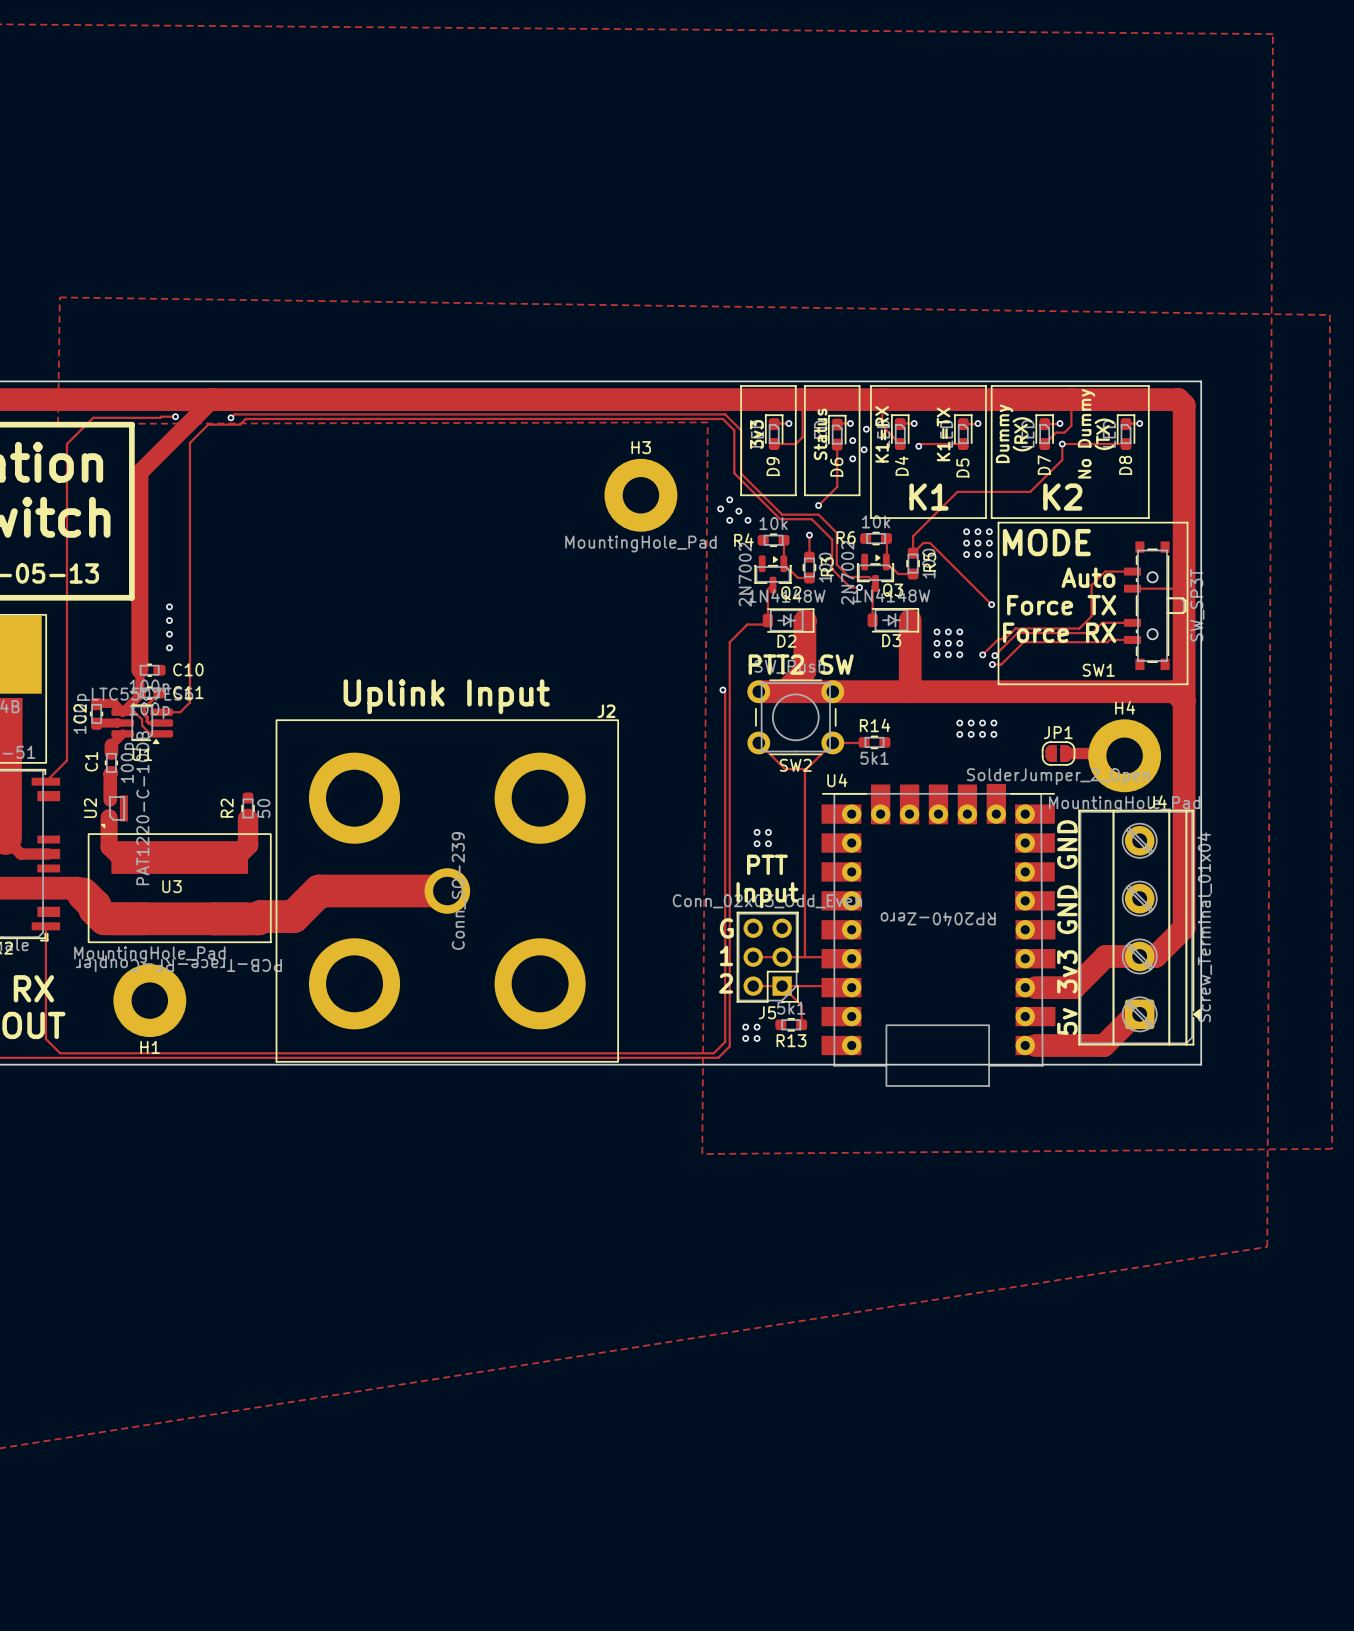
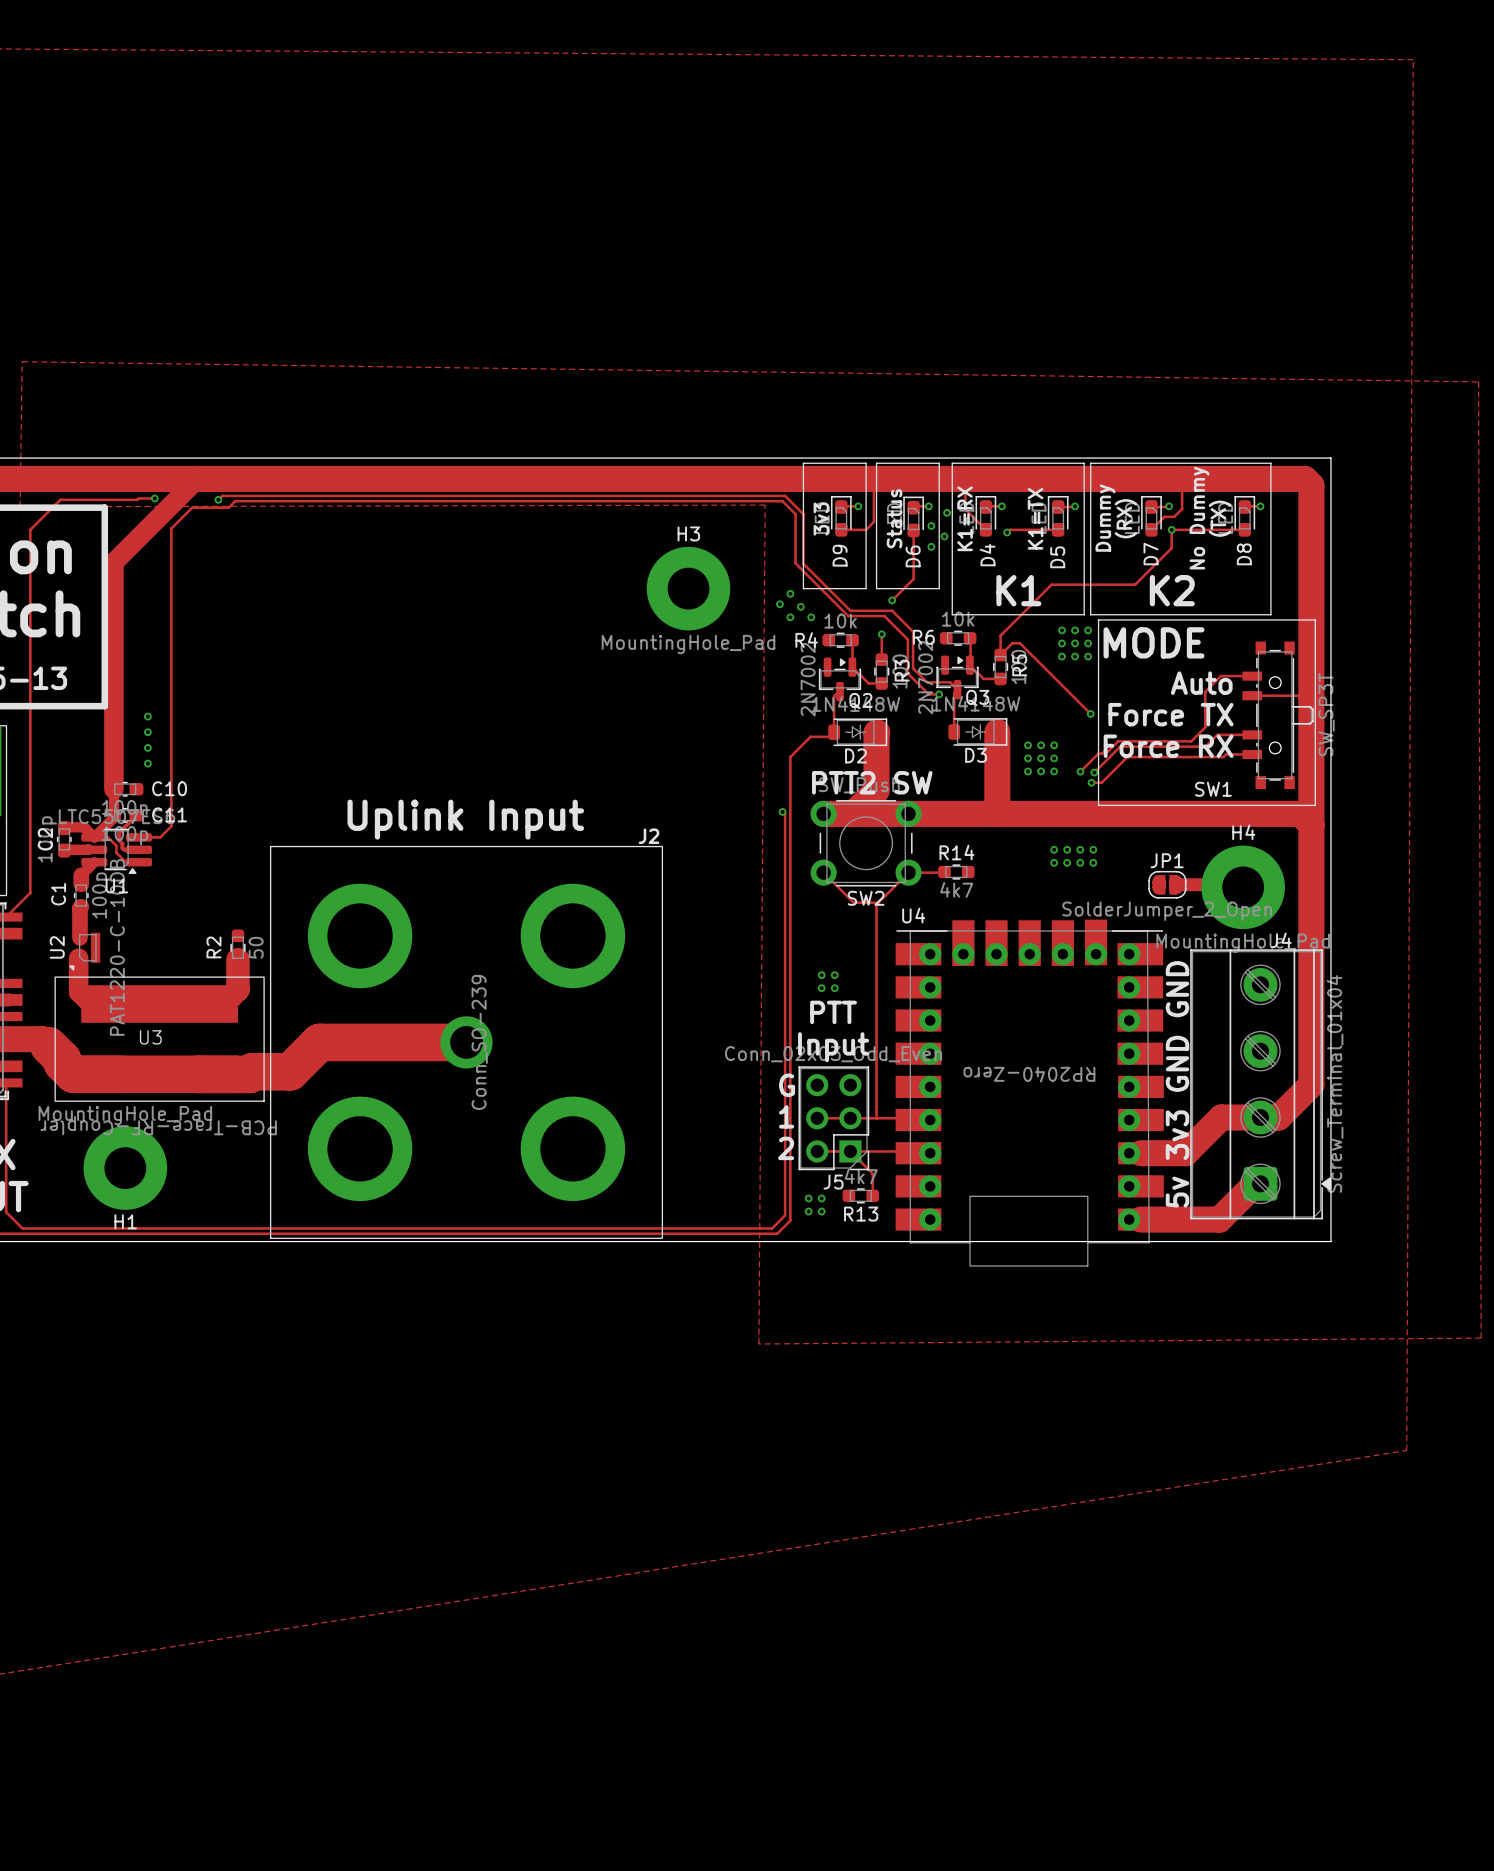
R14 value: 5k1 (874, 758) -> 4k7 (956, 889)
R13 value: 5k1 (791, 1008) -> 4k7 (861, 1176)

